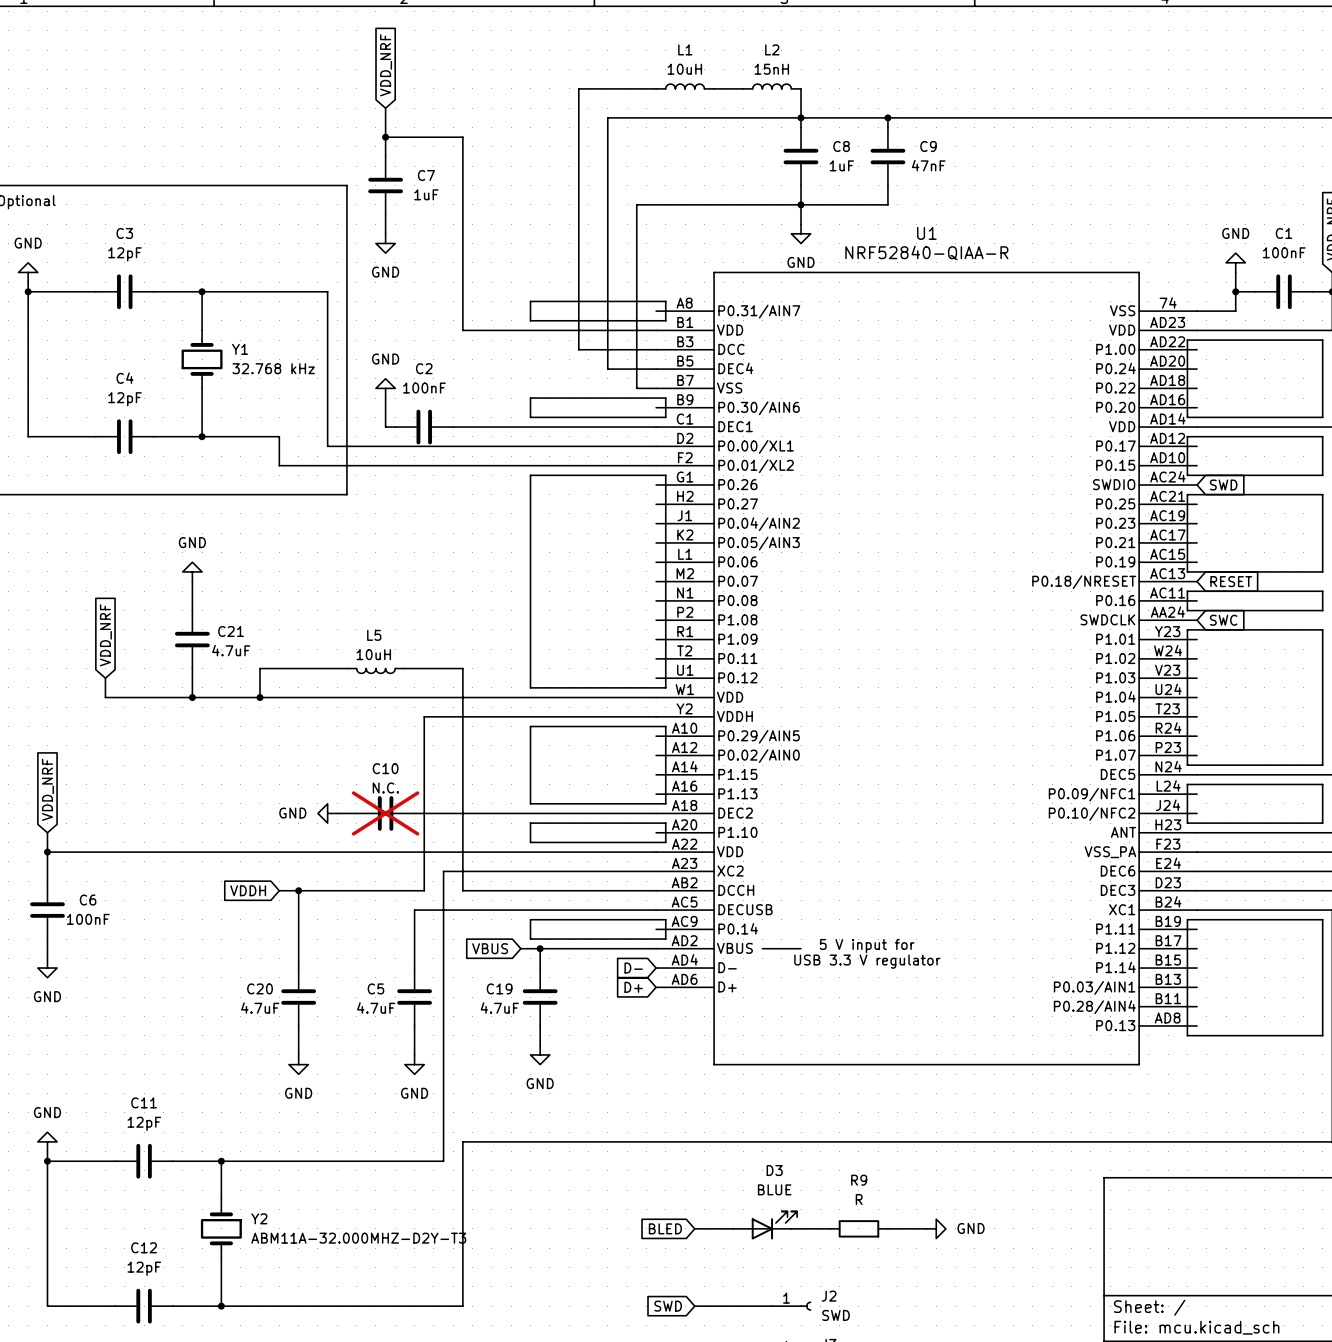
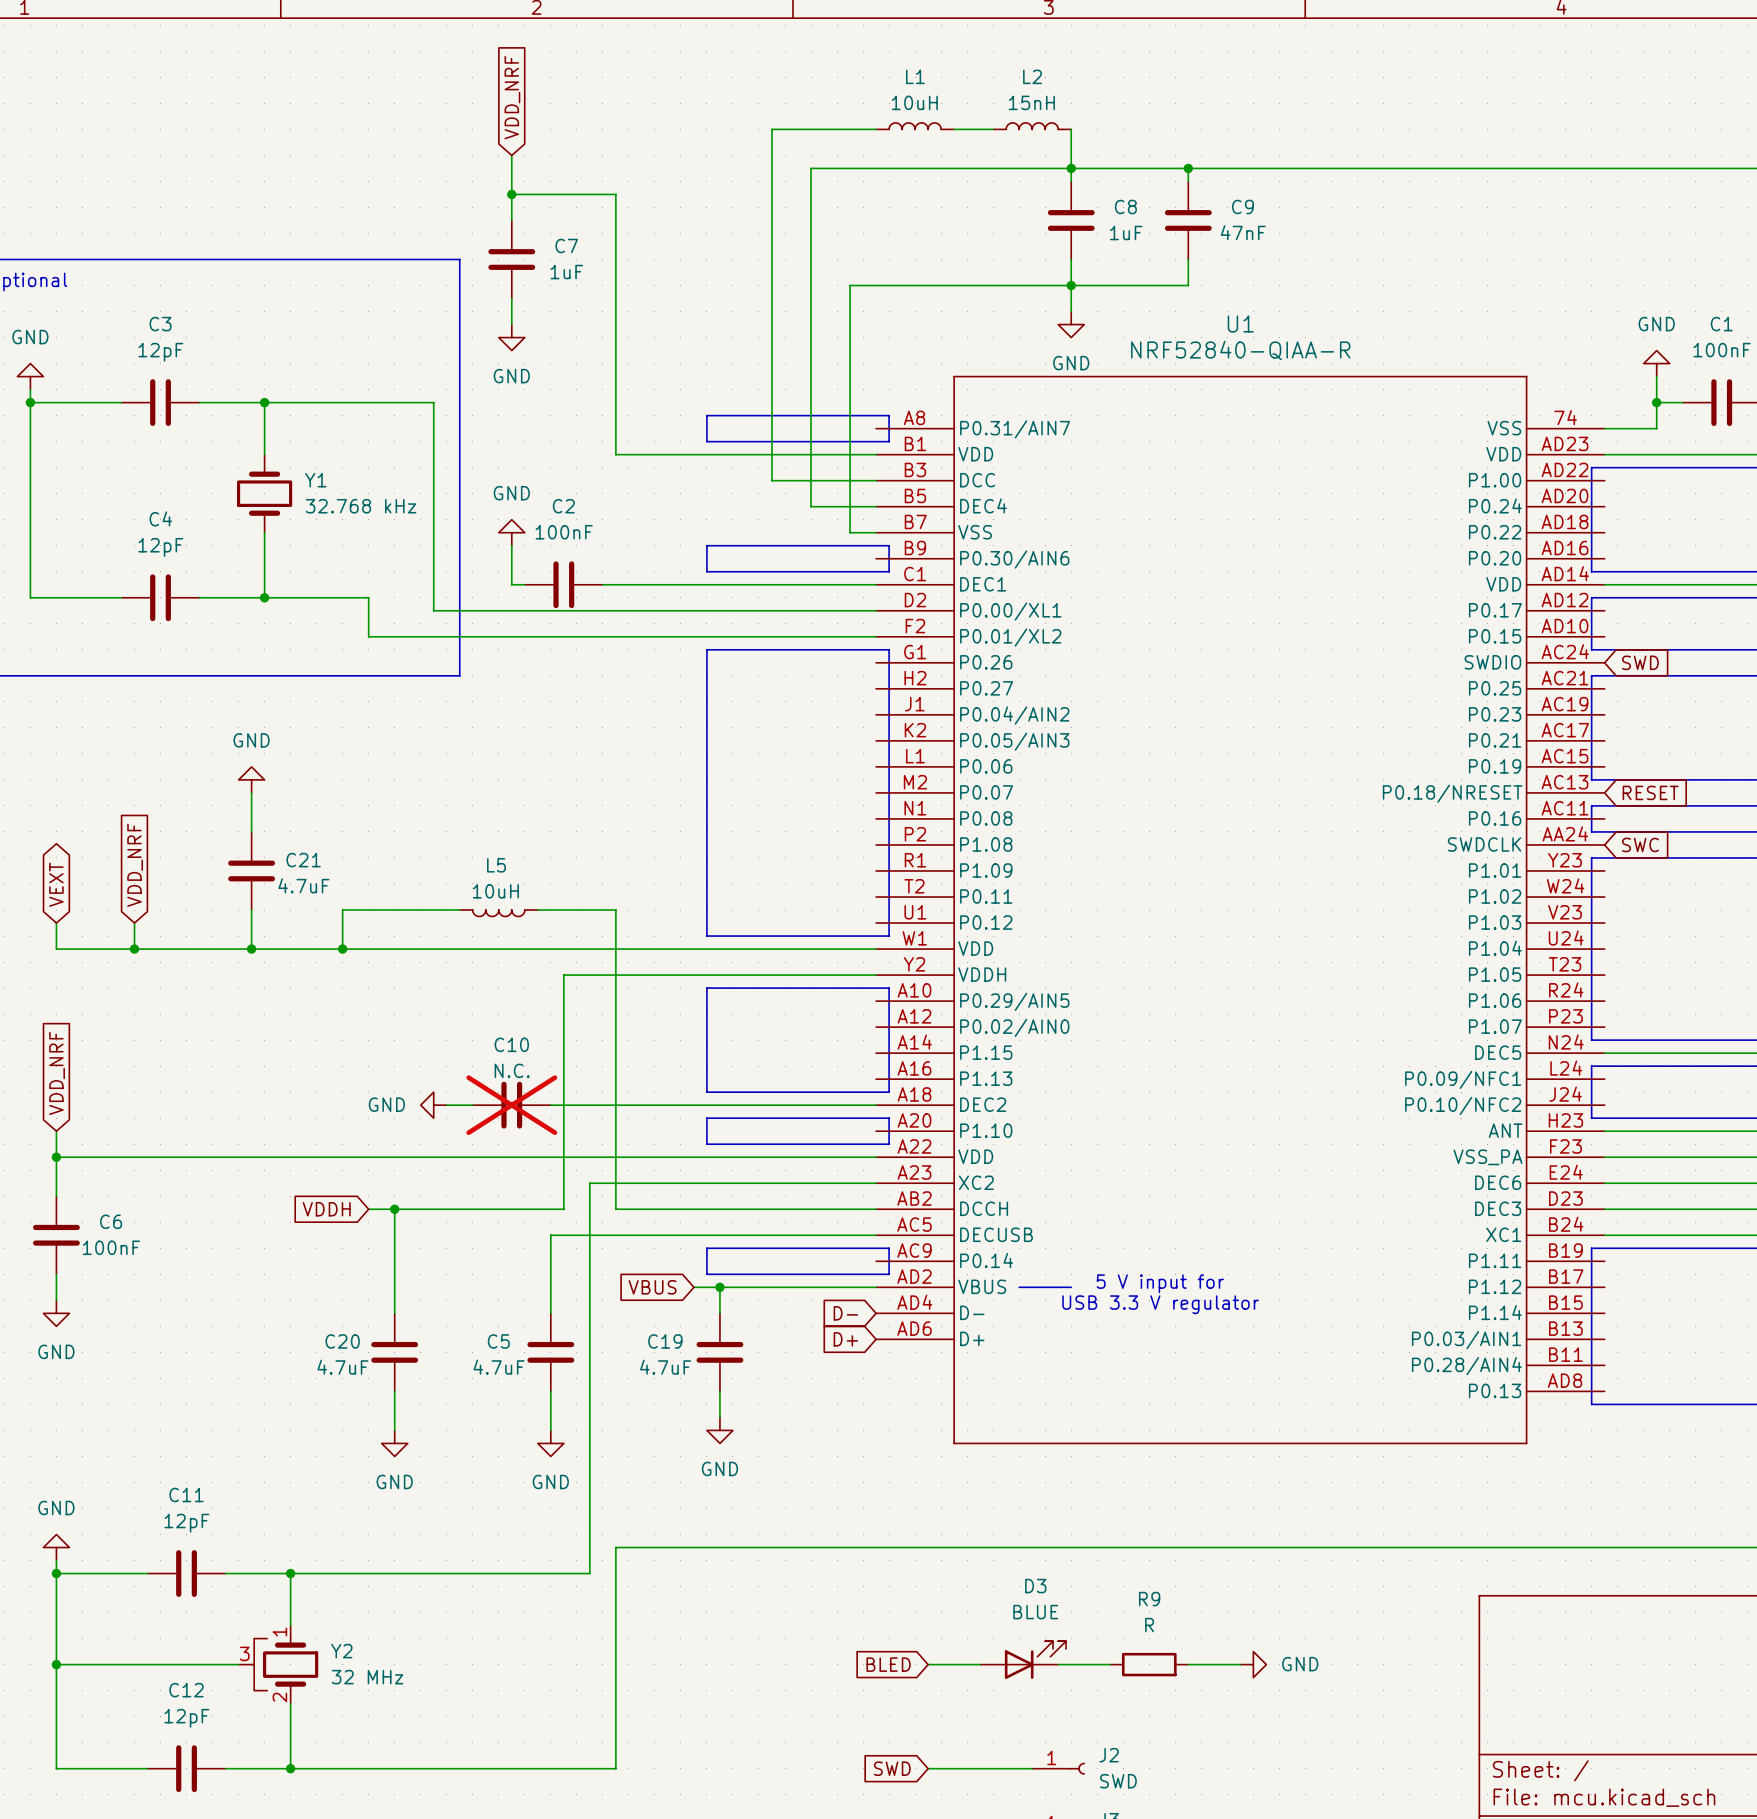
global label: none -> VEXT (56, 884)
wire: none -> (56, 923) (56, 949) (134, 949)
junction: none -> (134, 949)
Y2 symbol: [200, 1199, 242, 1258] -> [238, 1625, 319, 1704]
wire: none -> (56, 1664) (238, 1664)
junction: none -> (56, 1664)
Y2 value: ABM11A-32.000MHZ-D2Y-T3 (358, 1238) -> 32 MHz (367, 1677)

